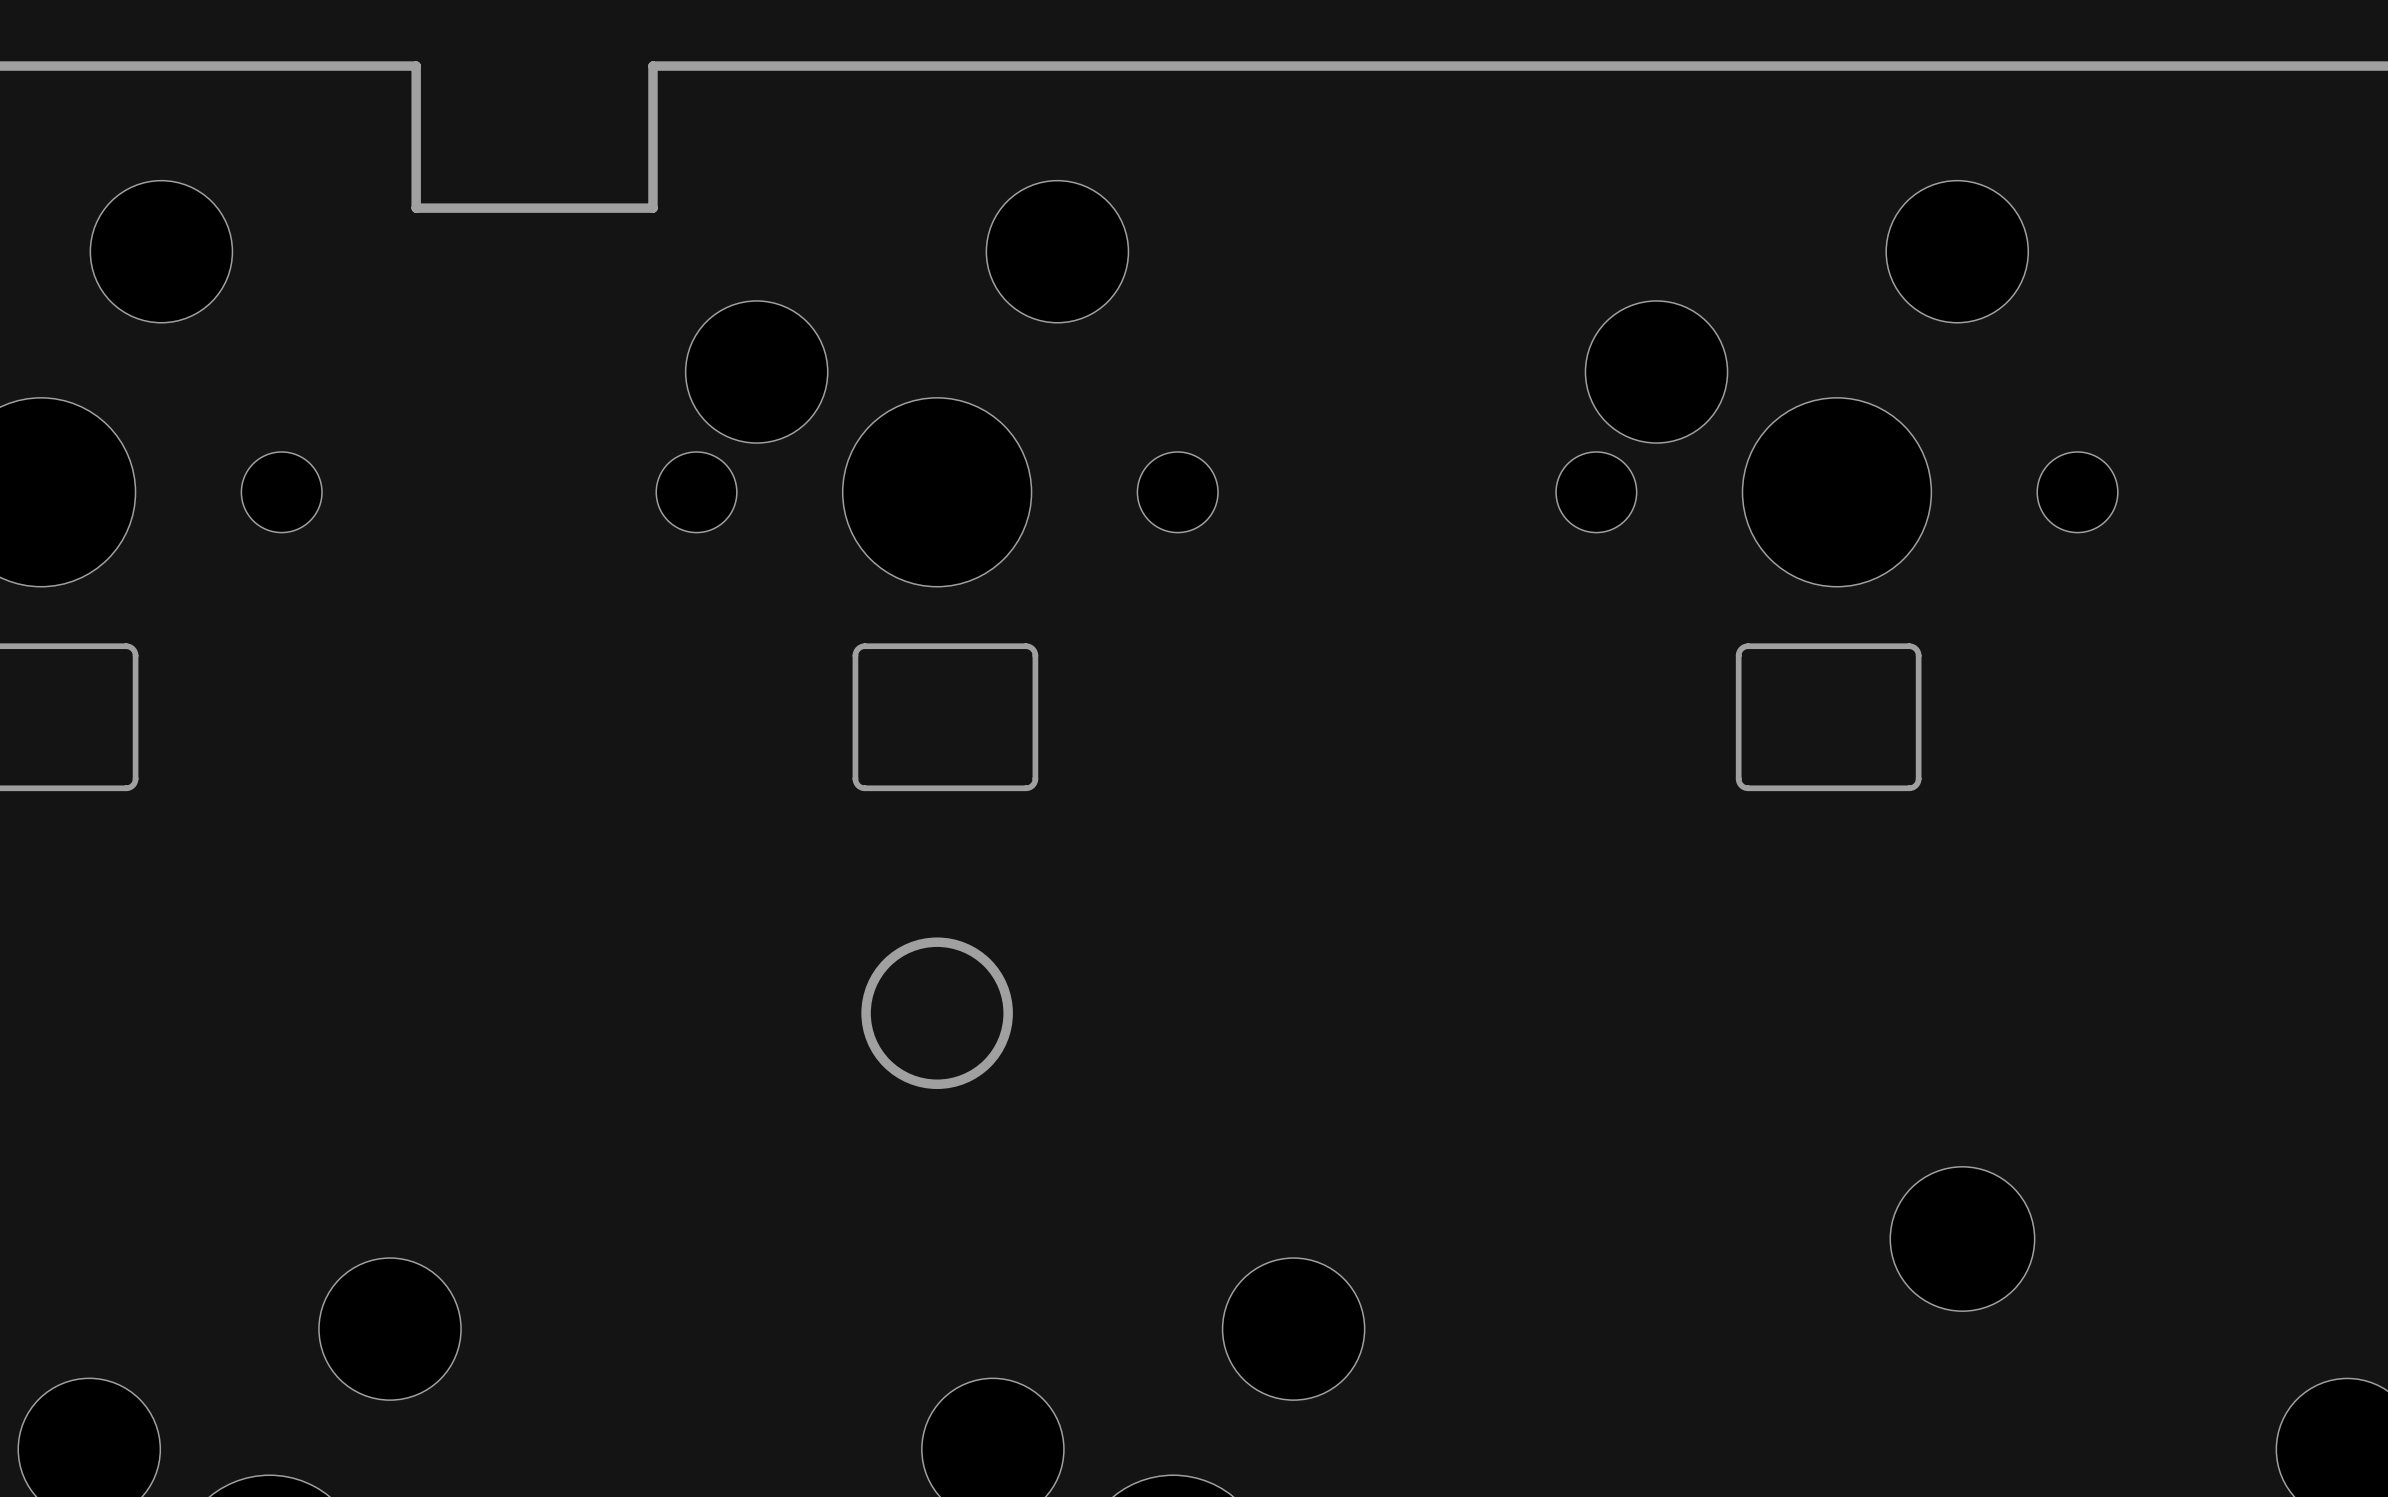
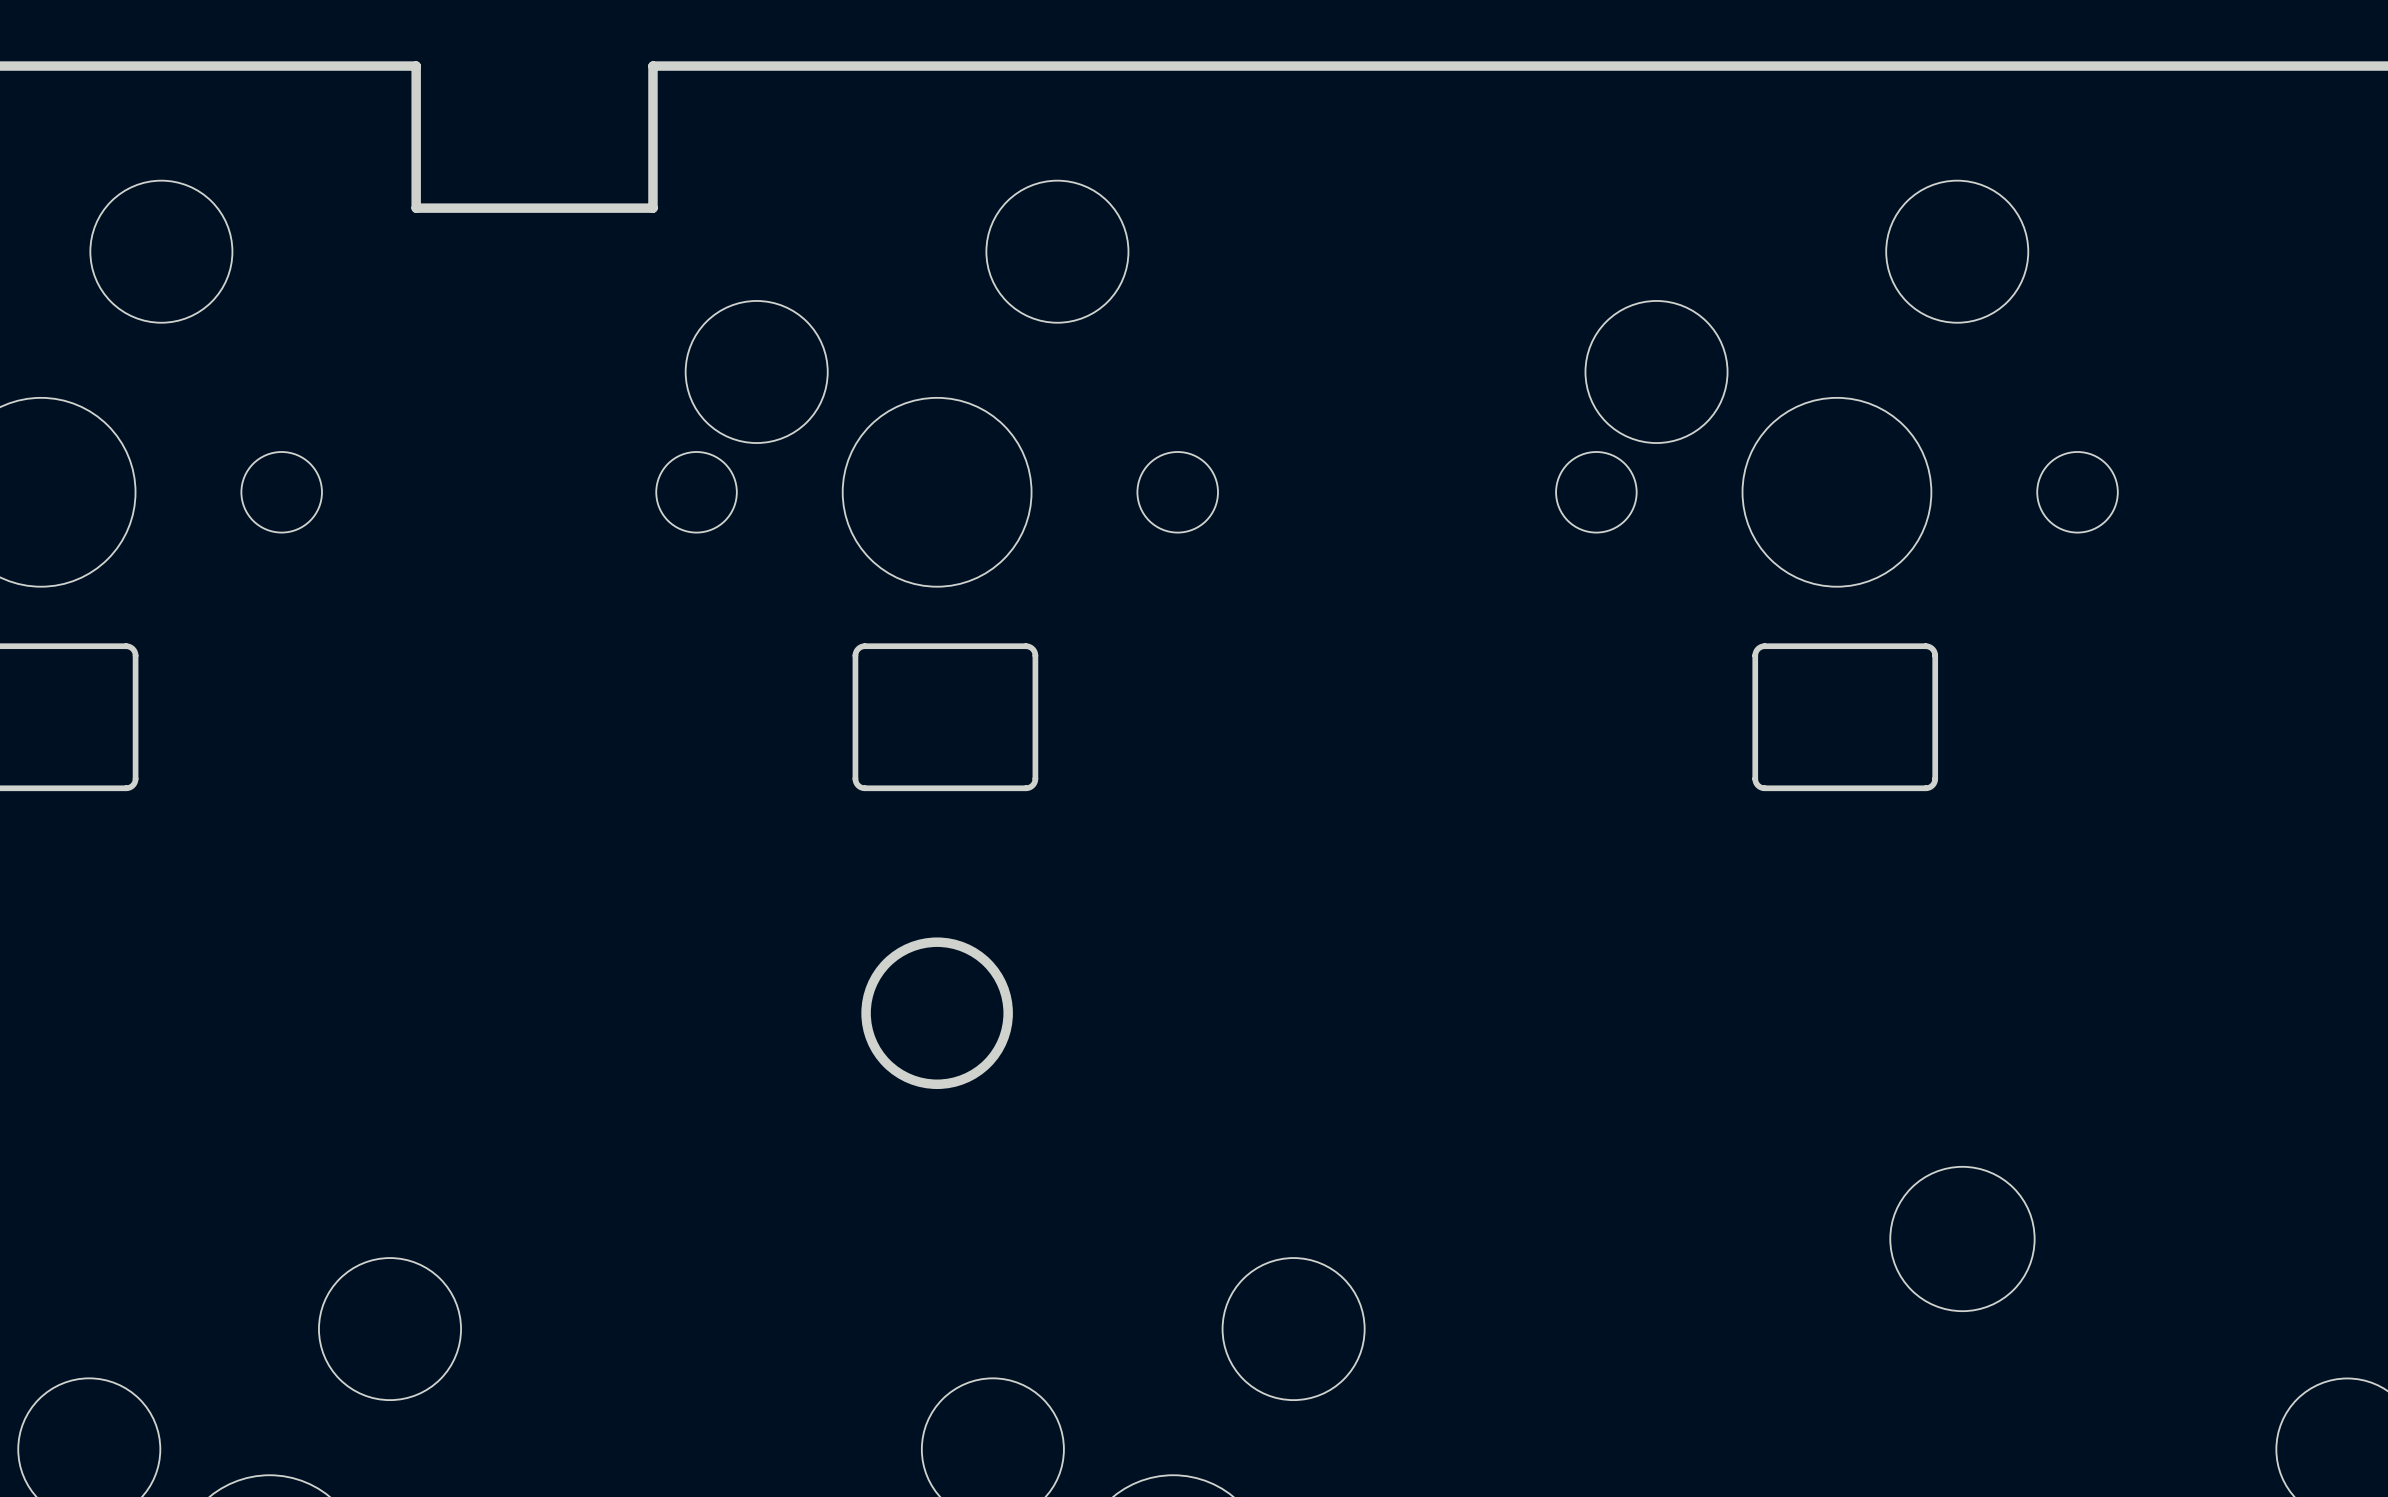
part position: (1828, 717) -> (1845, 717)

